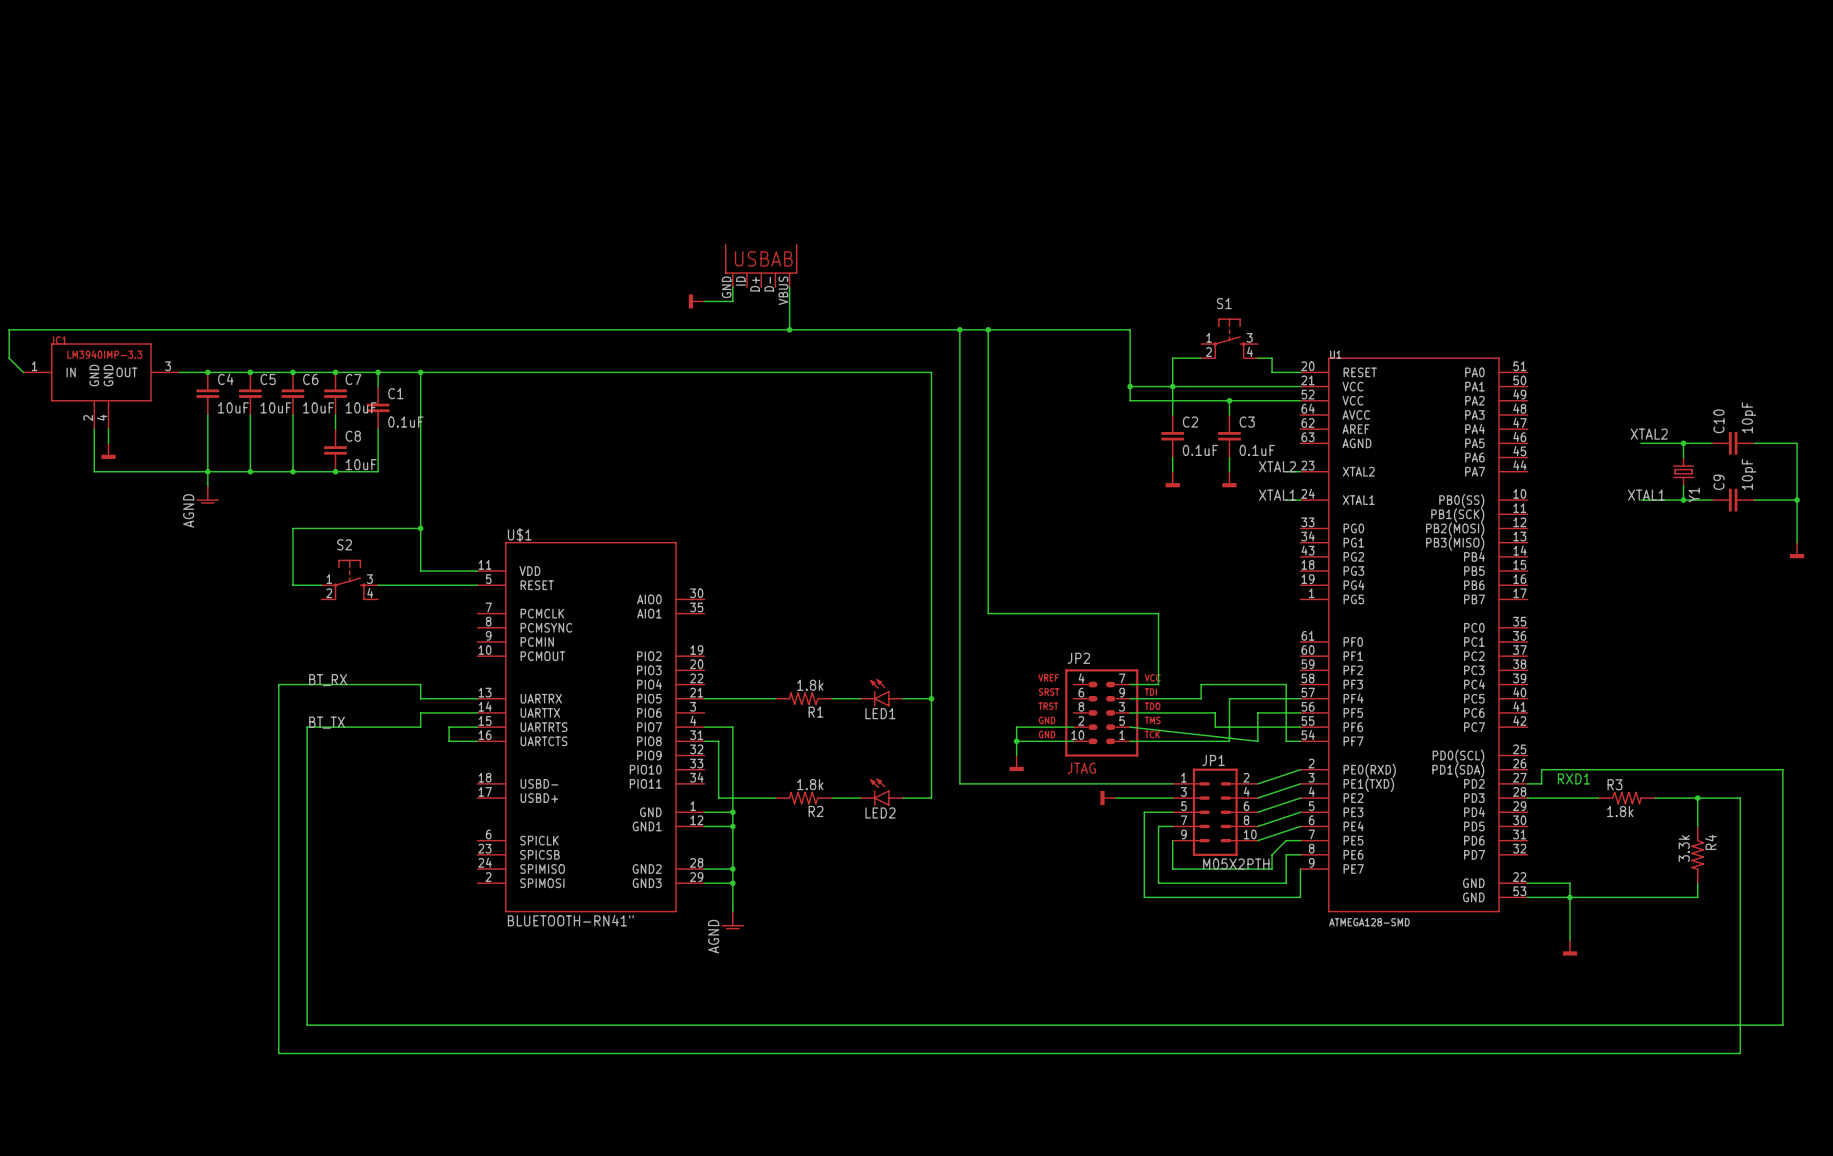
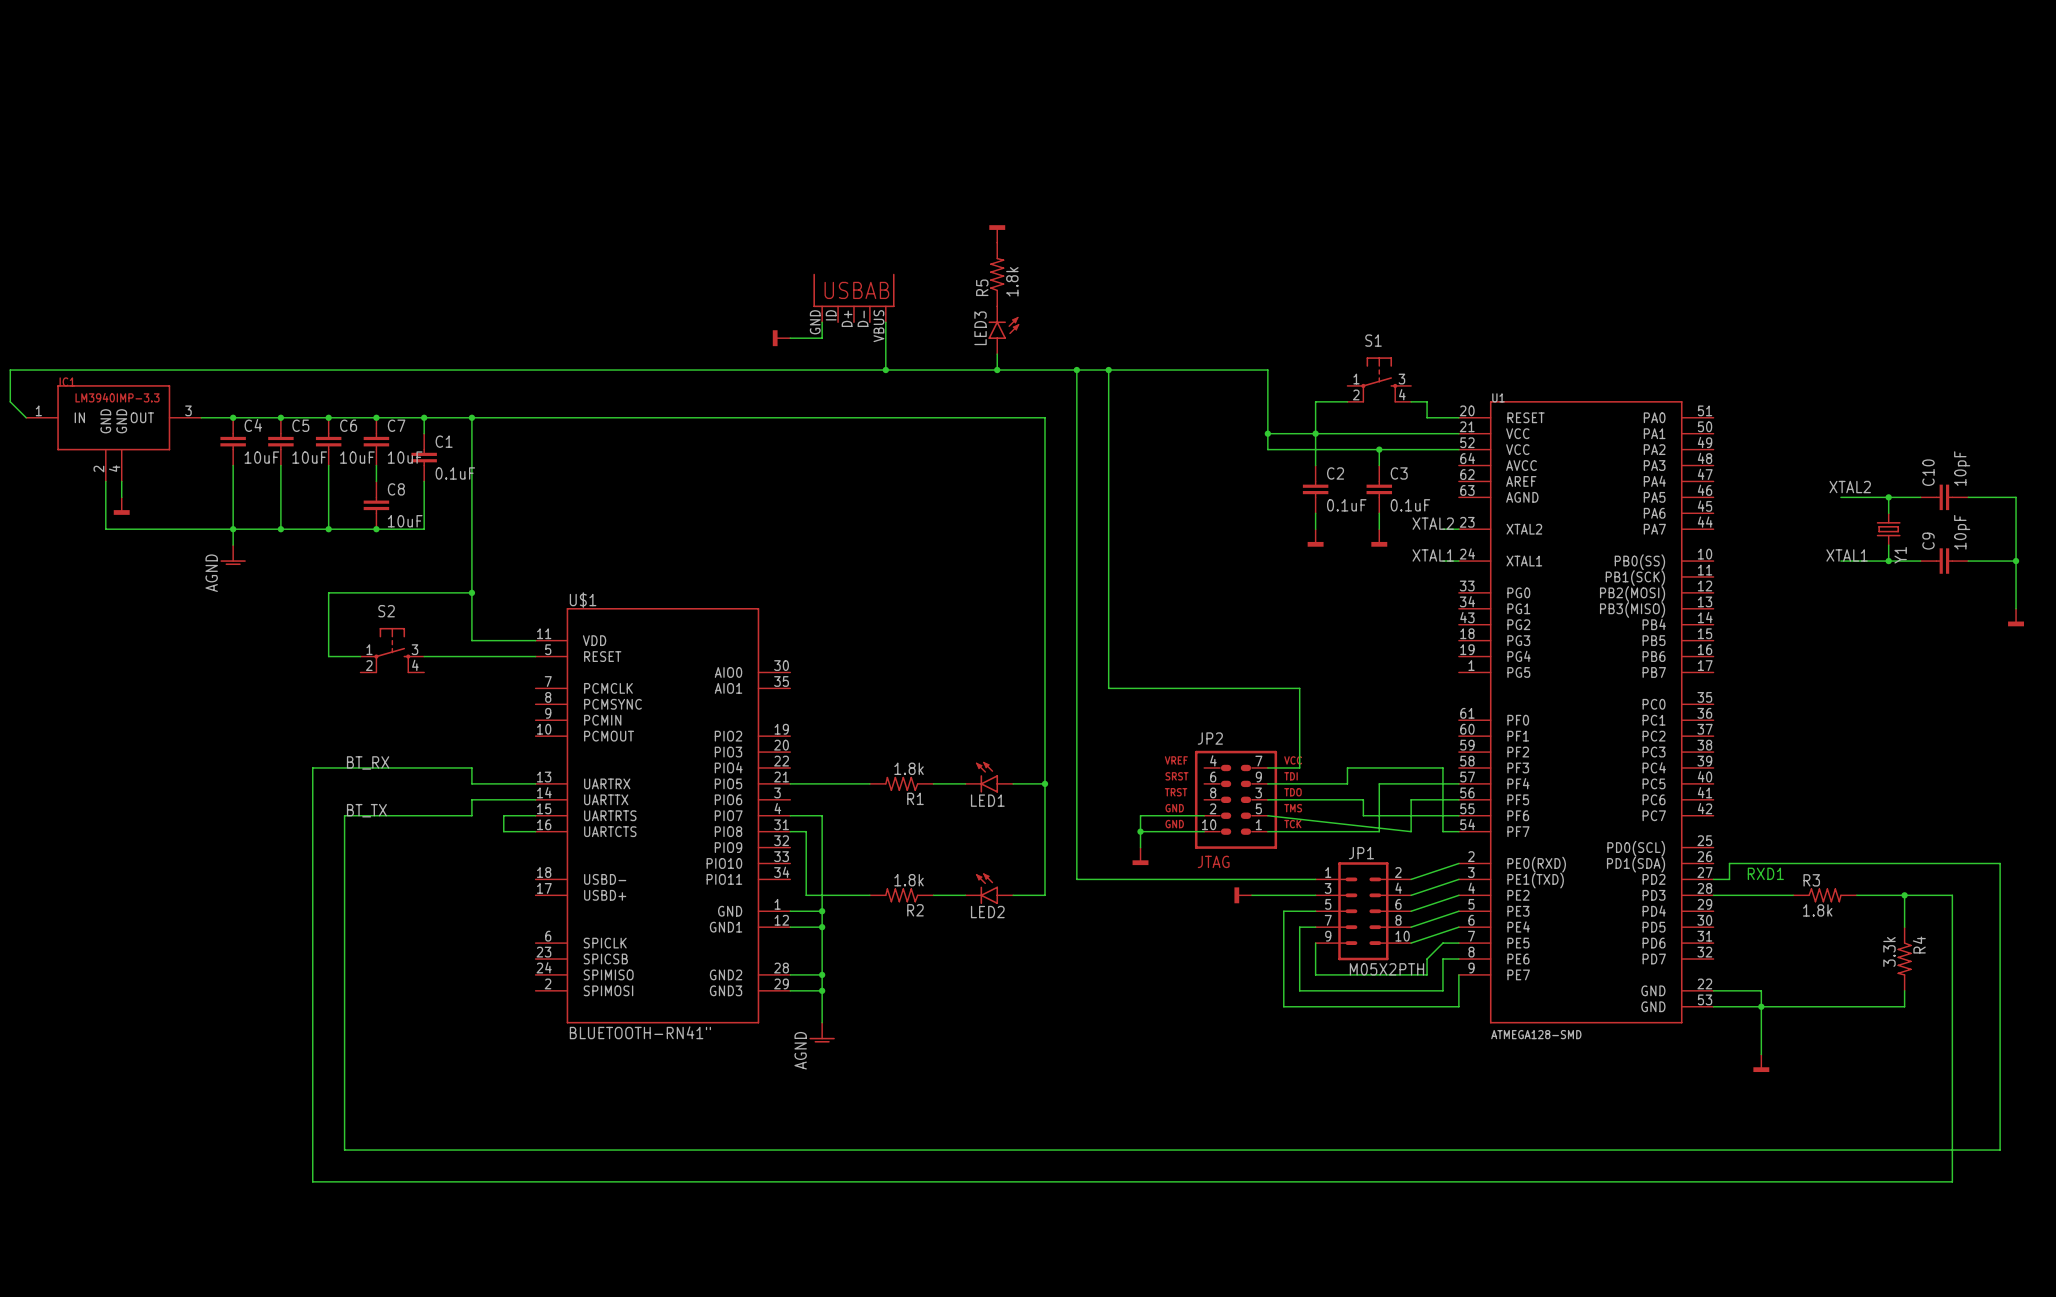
power symbol: none -> (997, 233)
R5: none -> 1.8k (997, 274)
LED3: none -> (1003, 330)
wire: none -> (997, 354) (997, 370)
junction: none -> (997, 370)

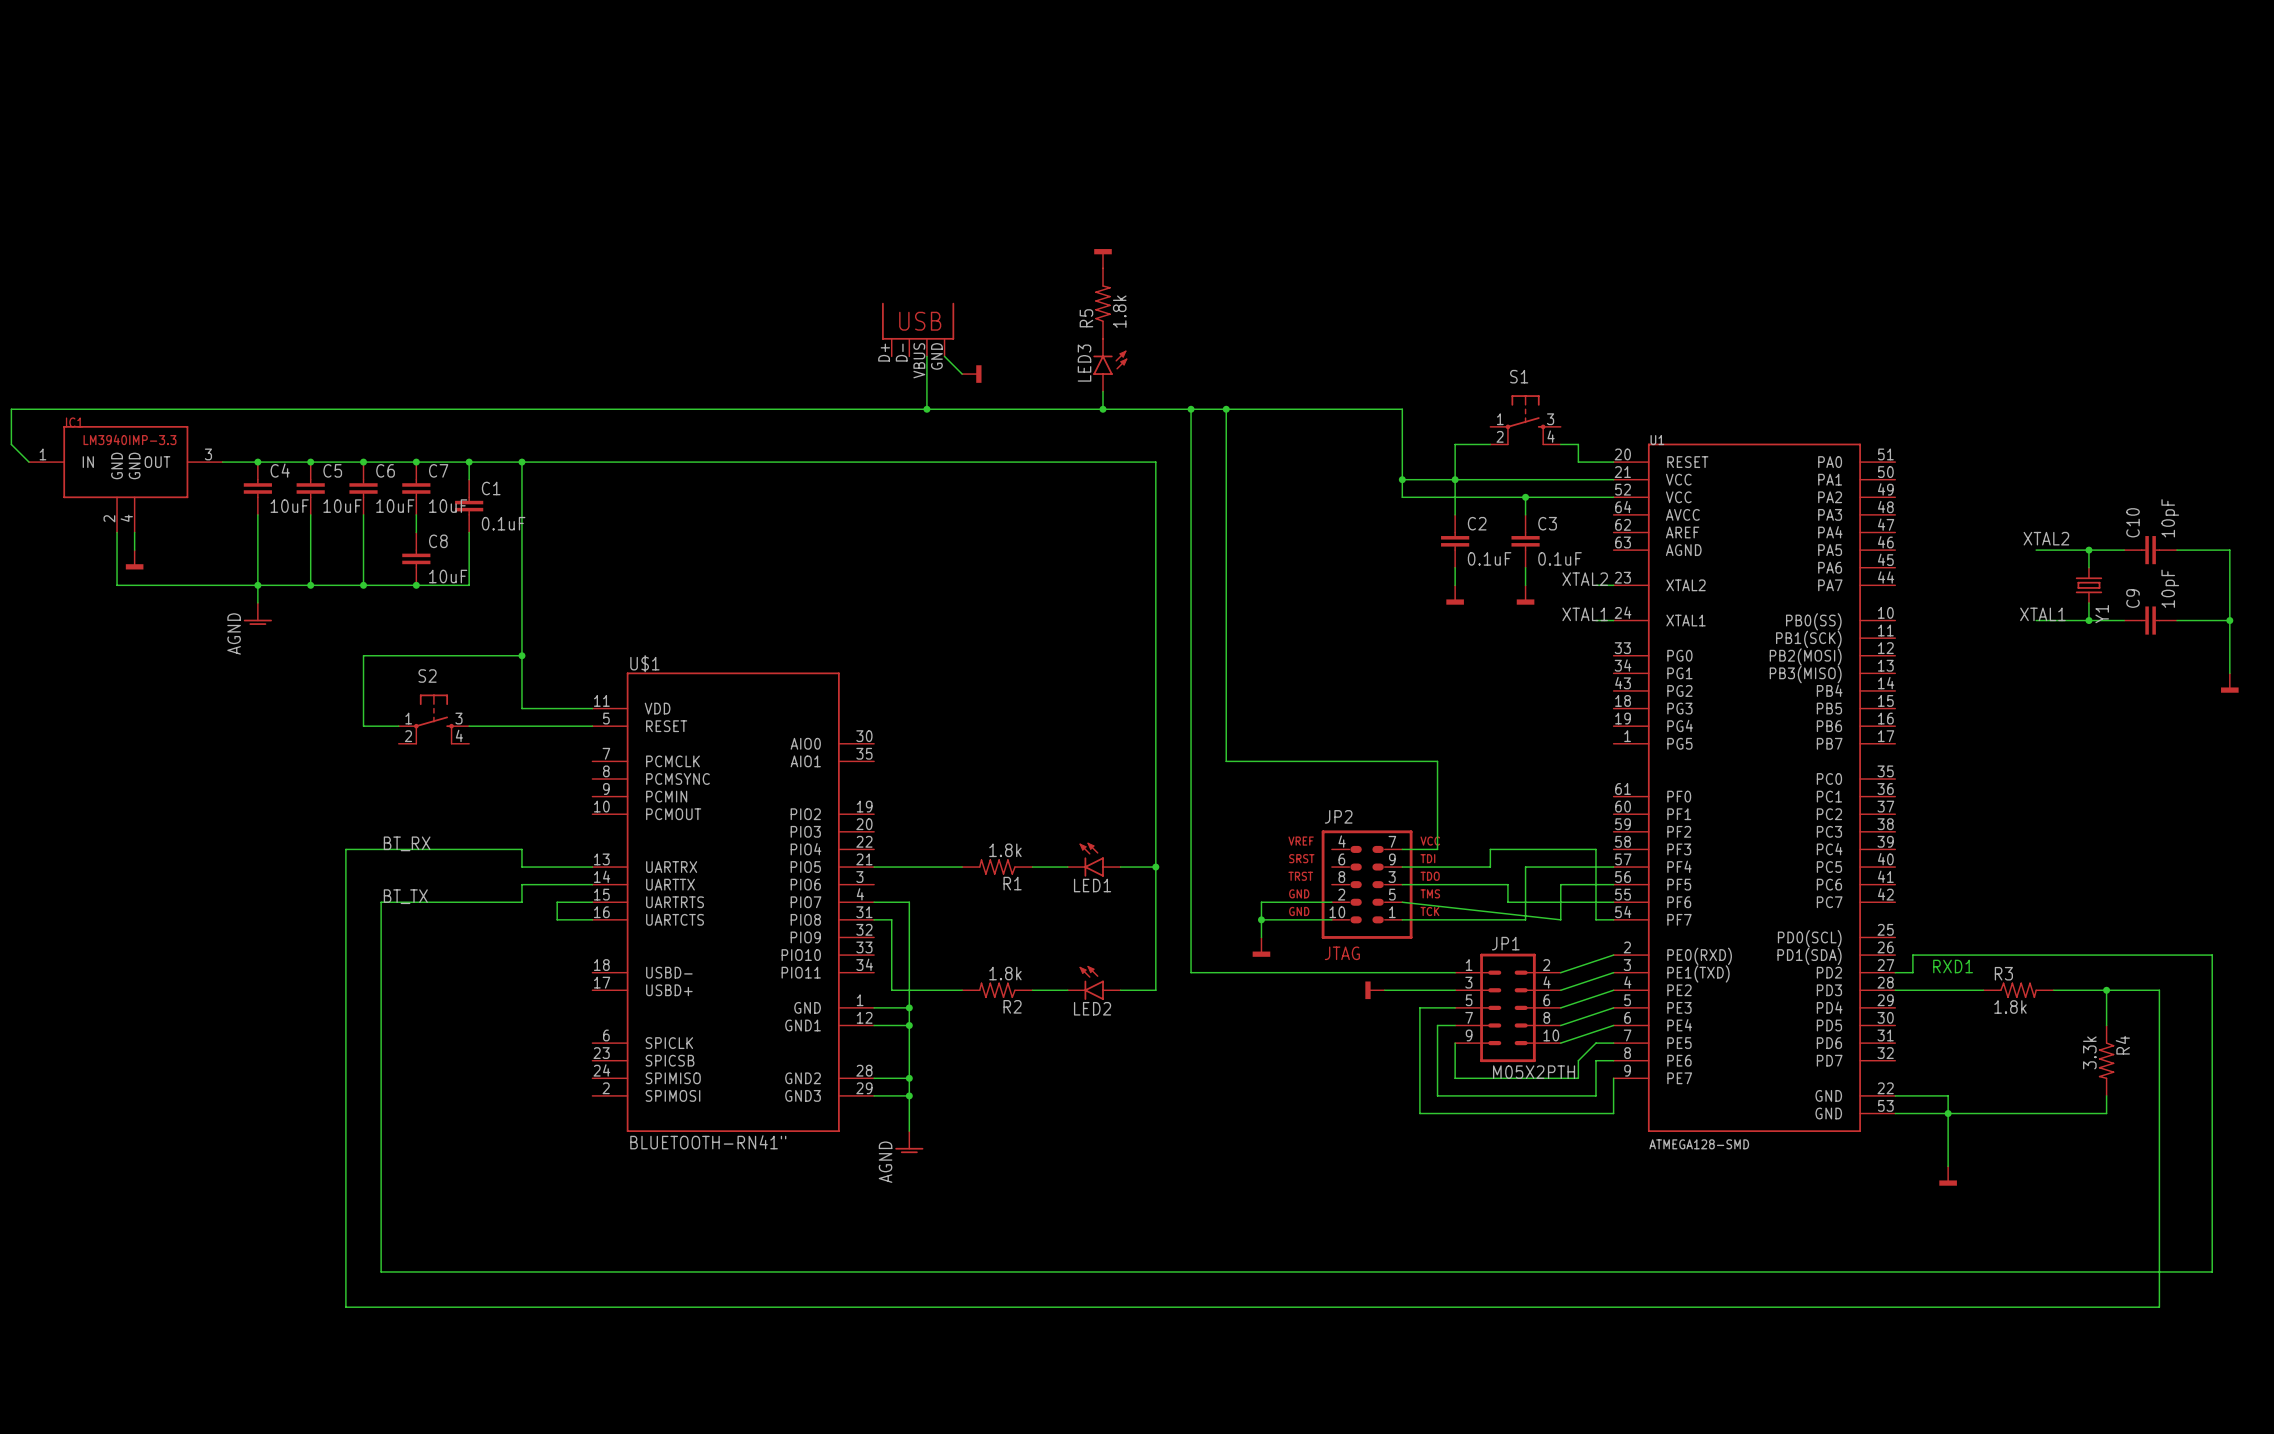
part: none -> (918, 329)
part: (853, 297) -> none
wire: (822, 322) (822, 338) (790, 338) -> none
wire: none -> (944, 356) (962, 374)
wire: (885, 322) (885, 370) -> (926, 356) (926, 409)
power symbol rotation: 0° (775, 338) -> 180° (978, 374)
power symbol position: (781, 338) -> (971, 374)
junction: none -> (926, 409)
junction: (885, 370) -> none

